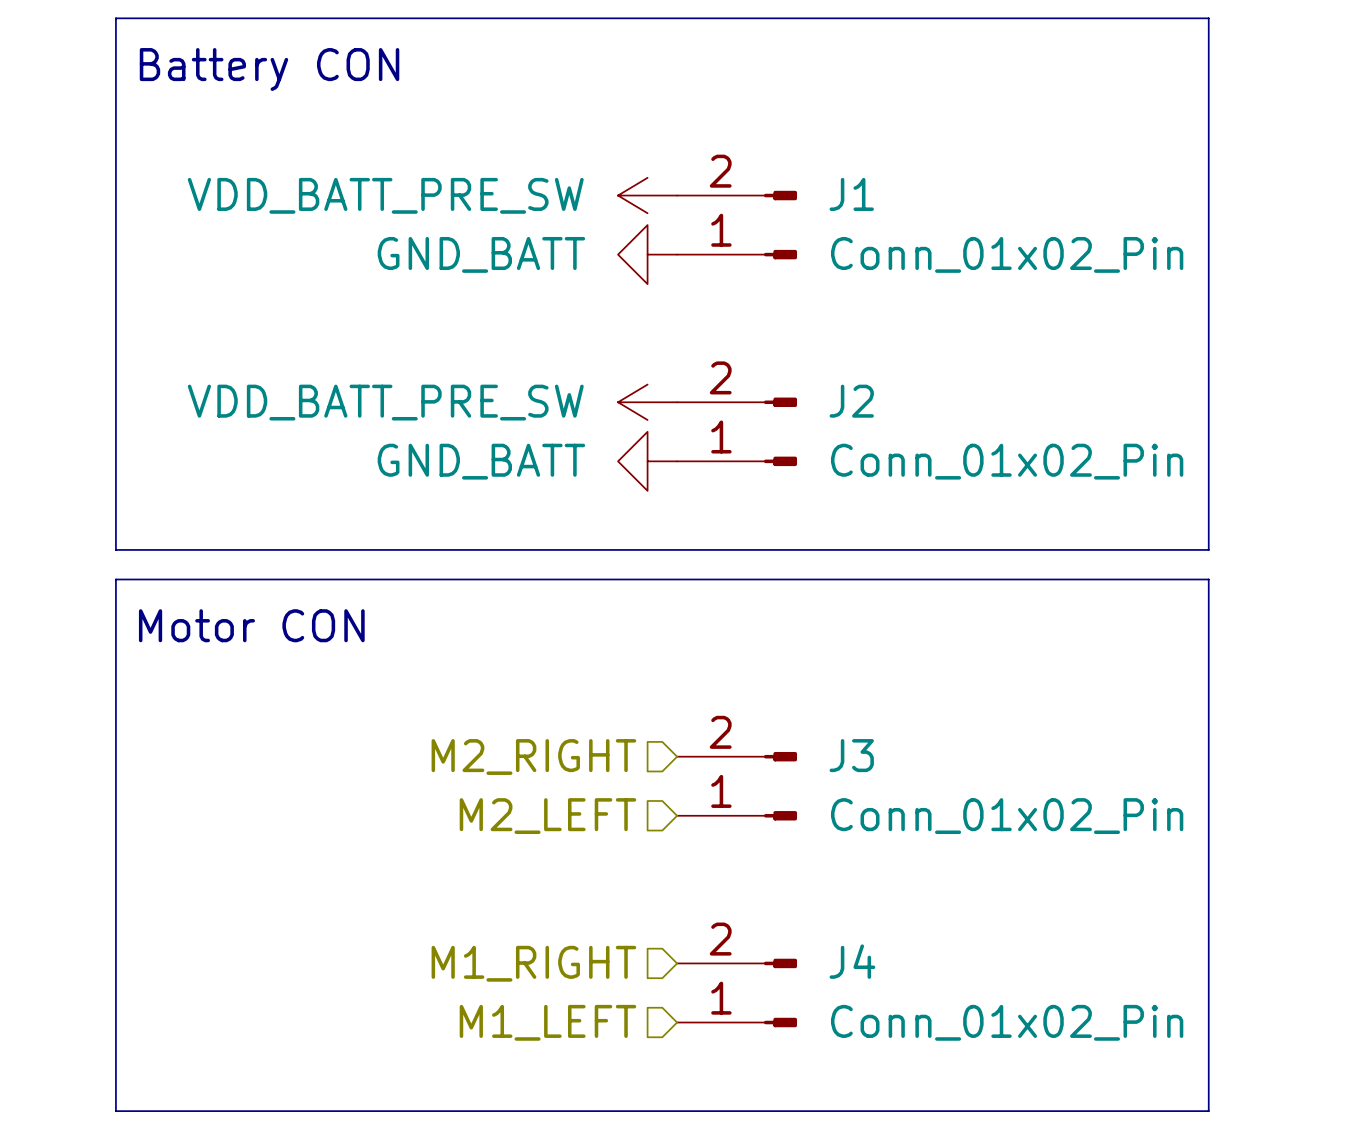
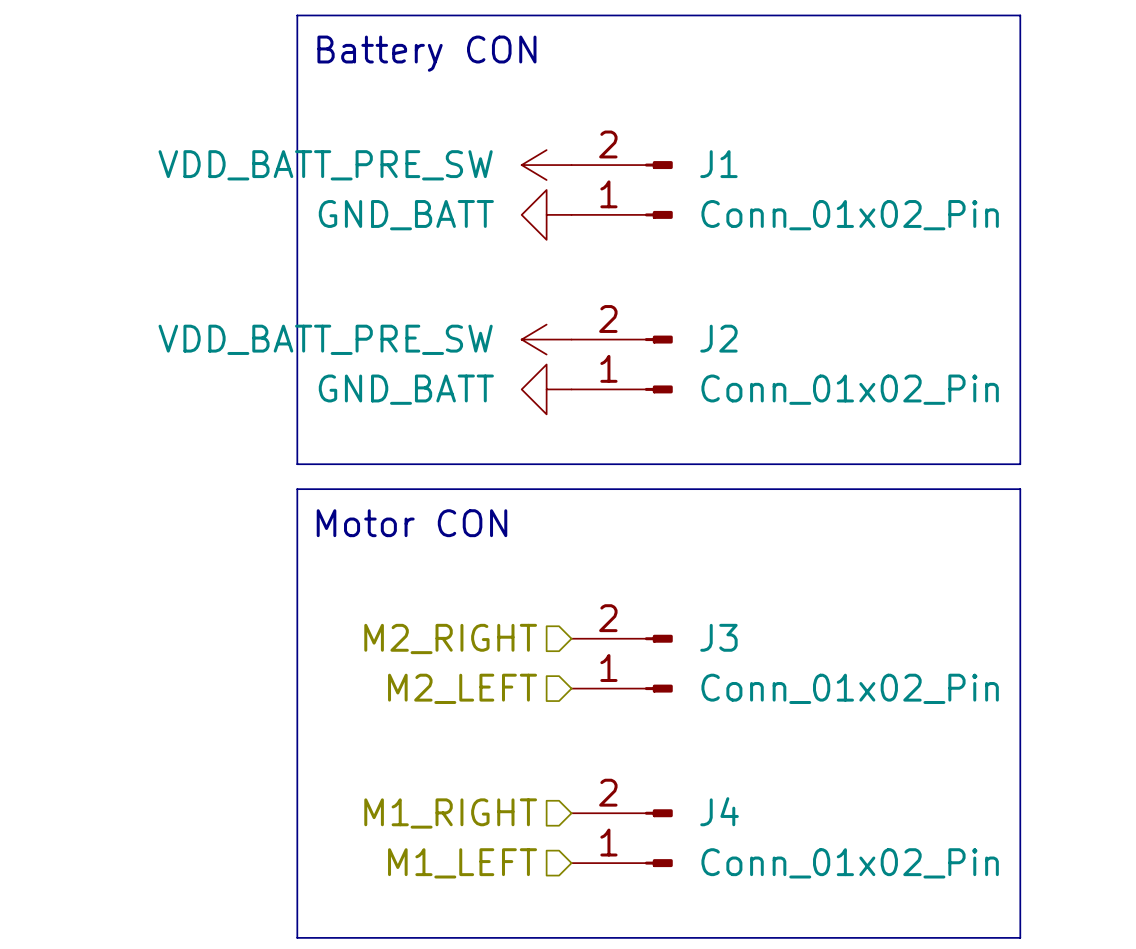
line: (352, 18) (115, 18) (115, 549) (352, 549) -> (297, 15) (297, 464)
text position: Battery CON (269, 69) -> Battery CON (426, 53)
line: (352, 579) (115, 579) (115, 1111) (352, 1111) -> (297, 489) (297, 937)
text position: Motor CON (251, 625) -> Motor CON (411, 523)

